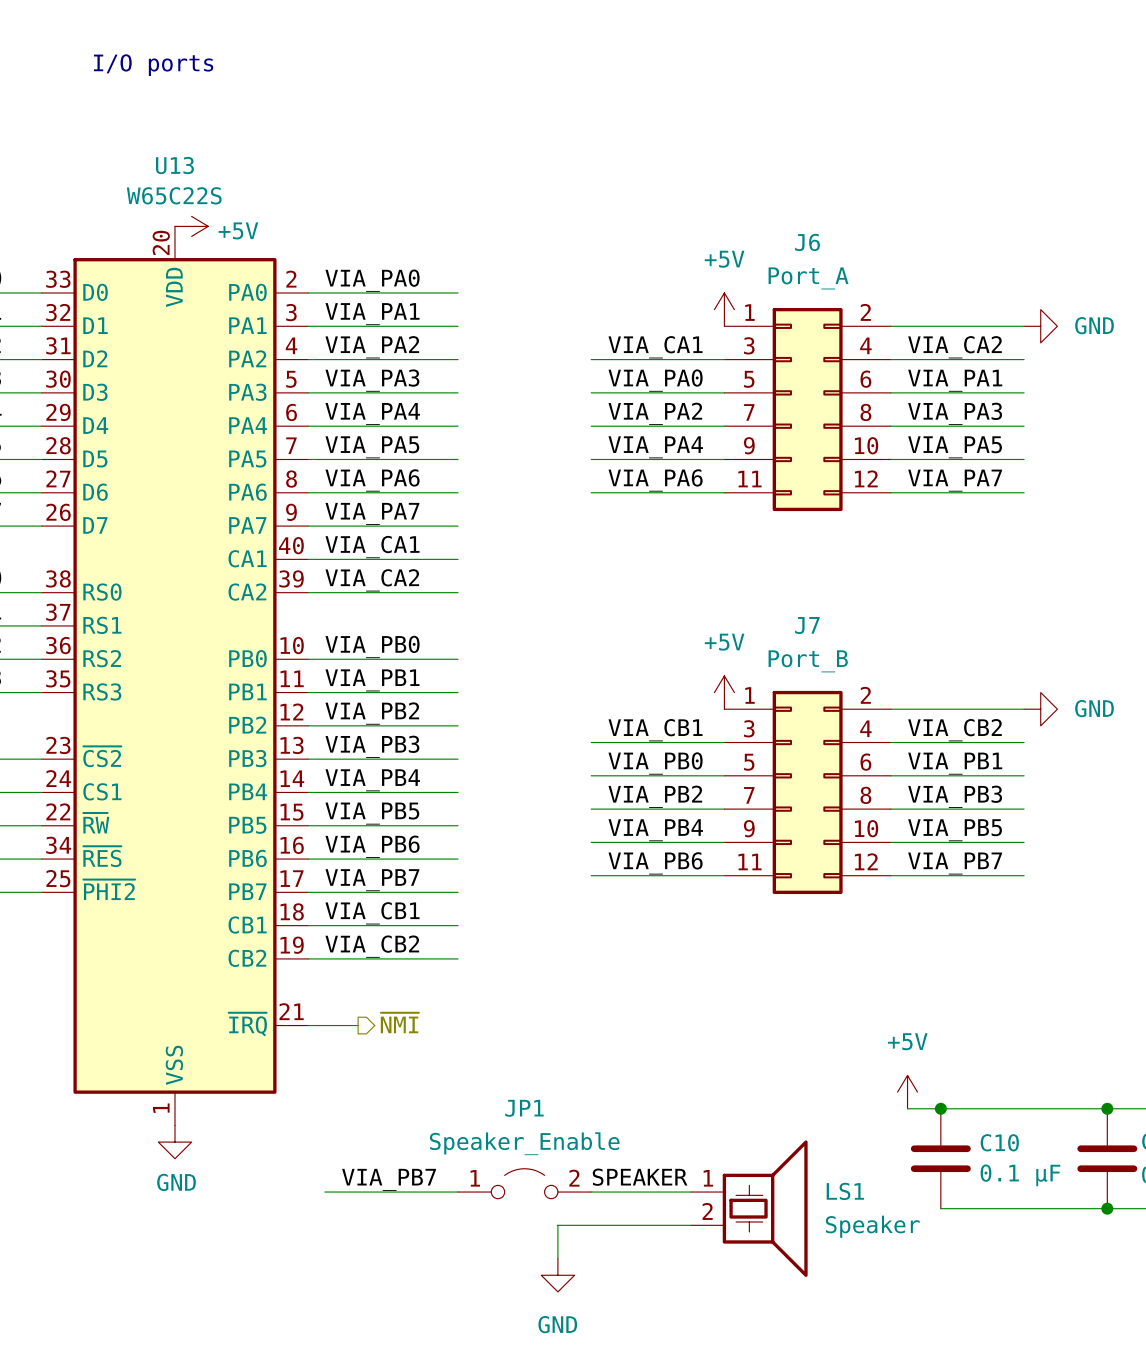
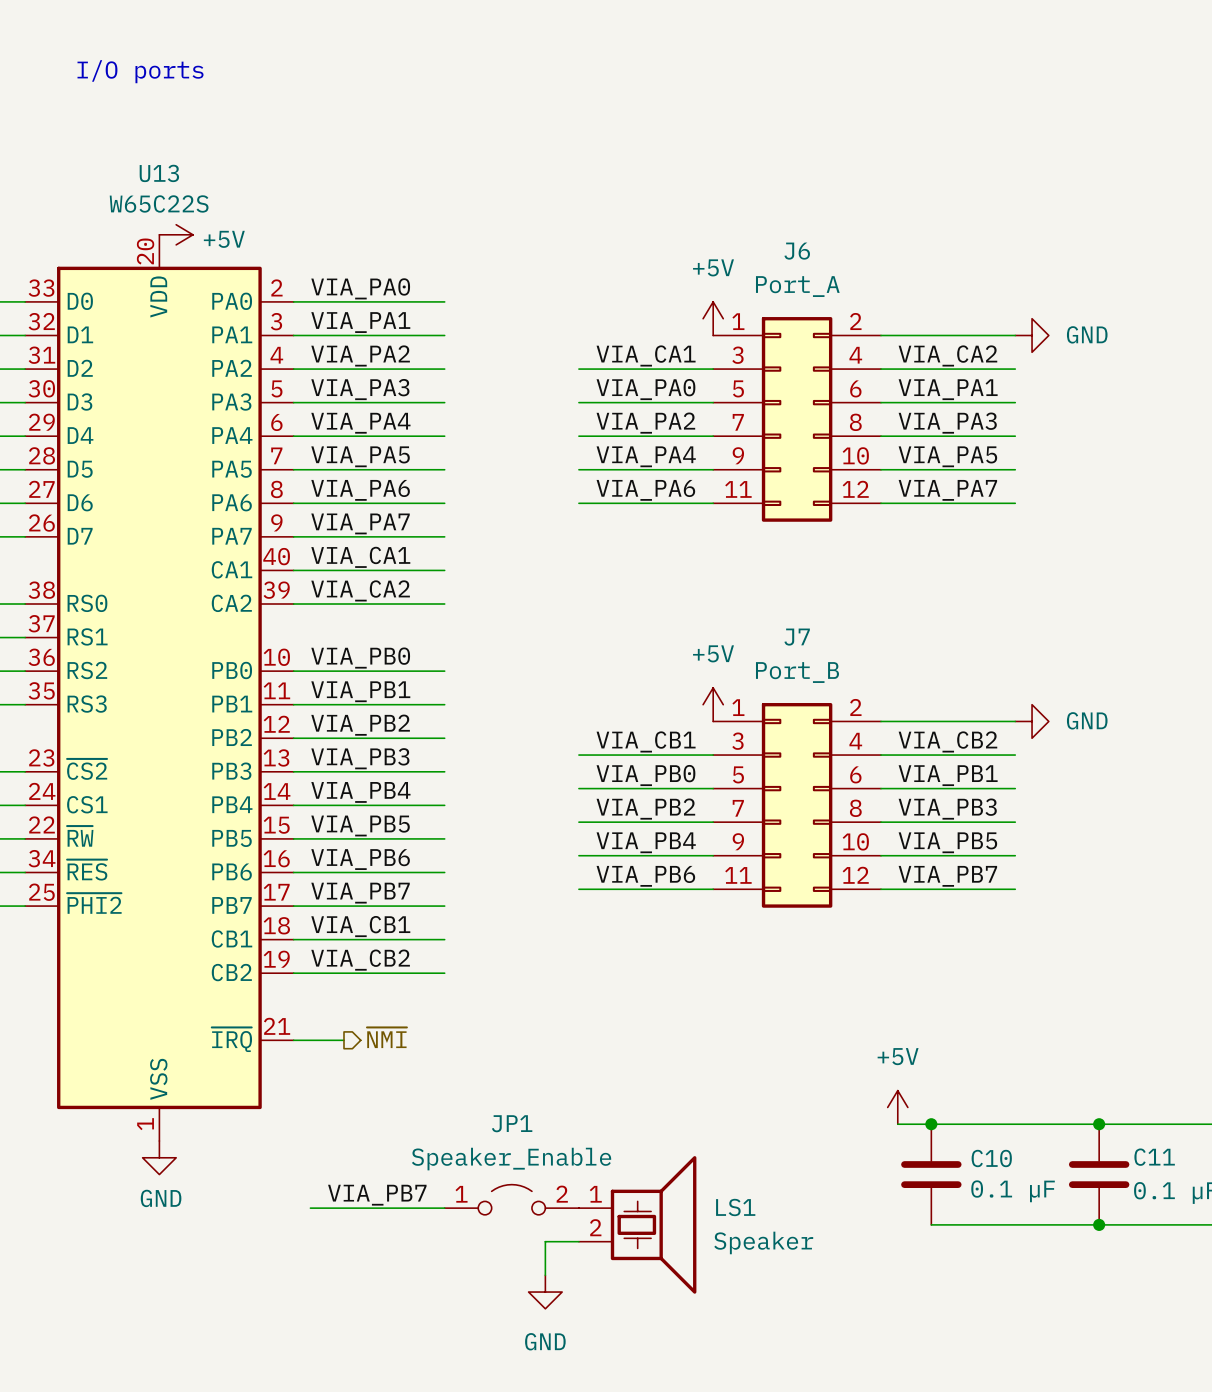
label: SPEAKER (640, 1177) -> none
wire: (591, 1192) (691, 1192) -> none
LS1 position: (749, 1208) -> (637, 1224)
wire: (591, 1225) (691, 1225) -> none

